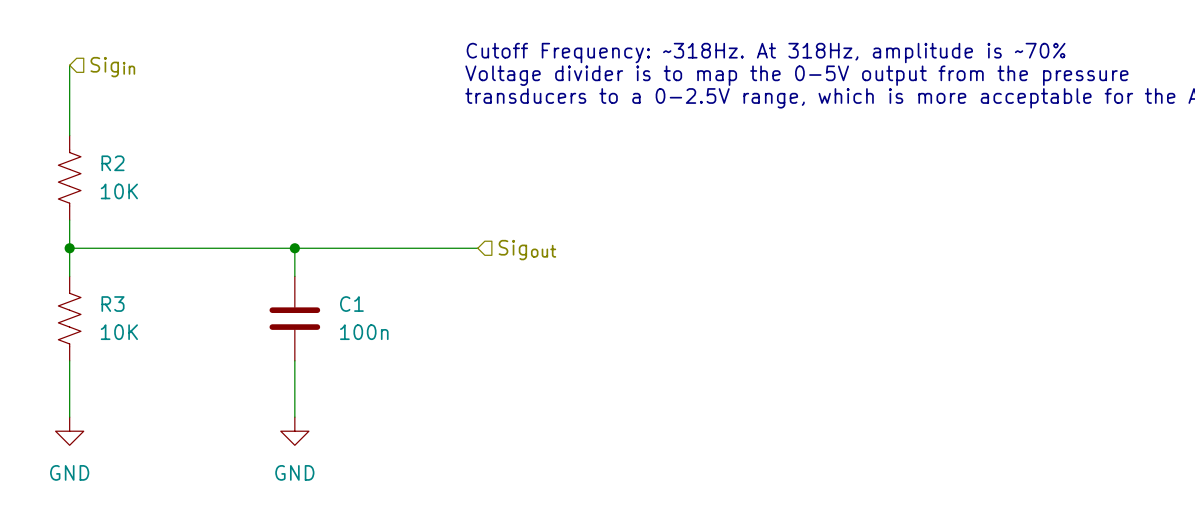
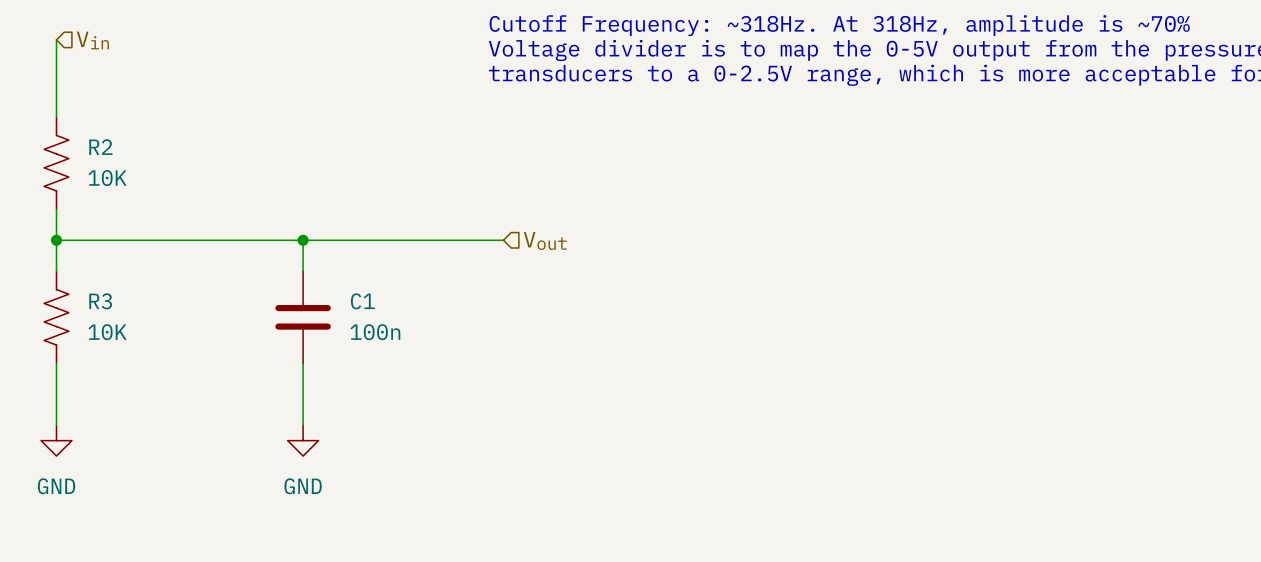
hierarchical label: Sigin (112, 67) -> Vin (92, 40)
hierarchical label: Sigout (527, 250) -> Vout (545, 240)

